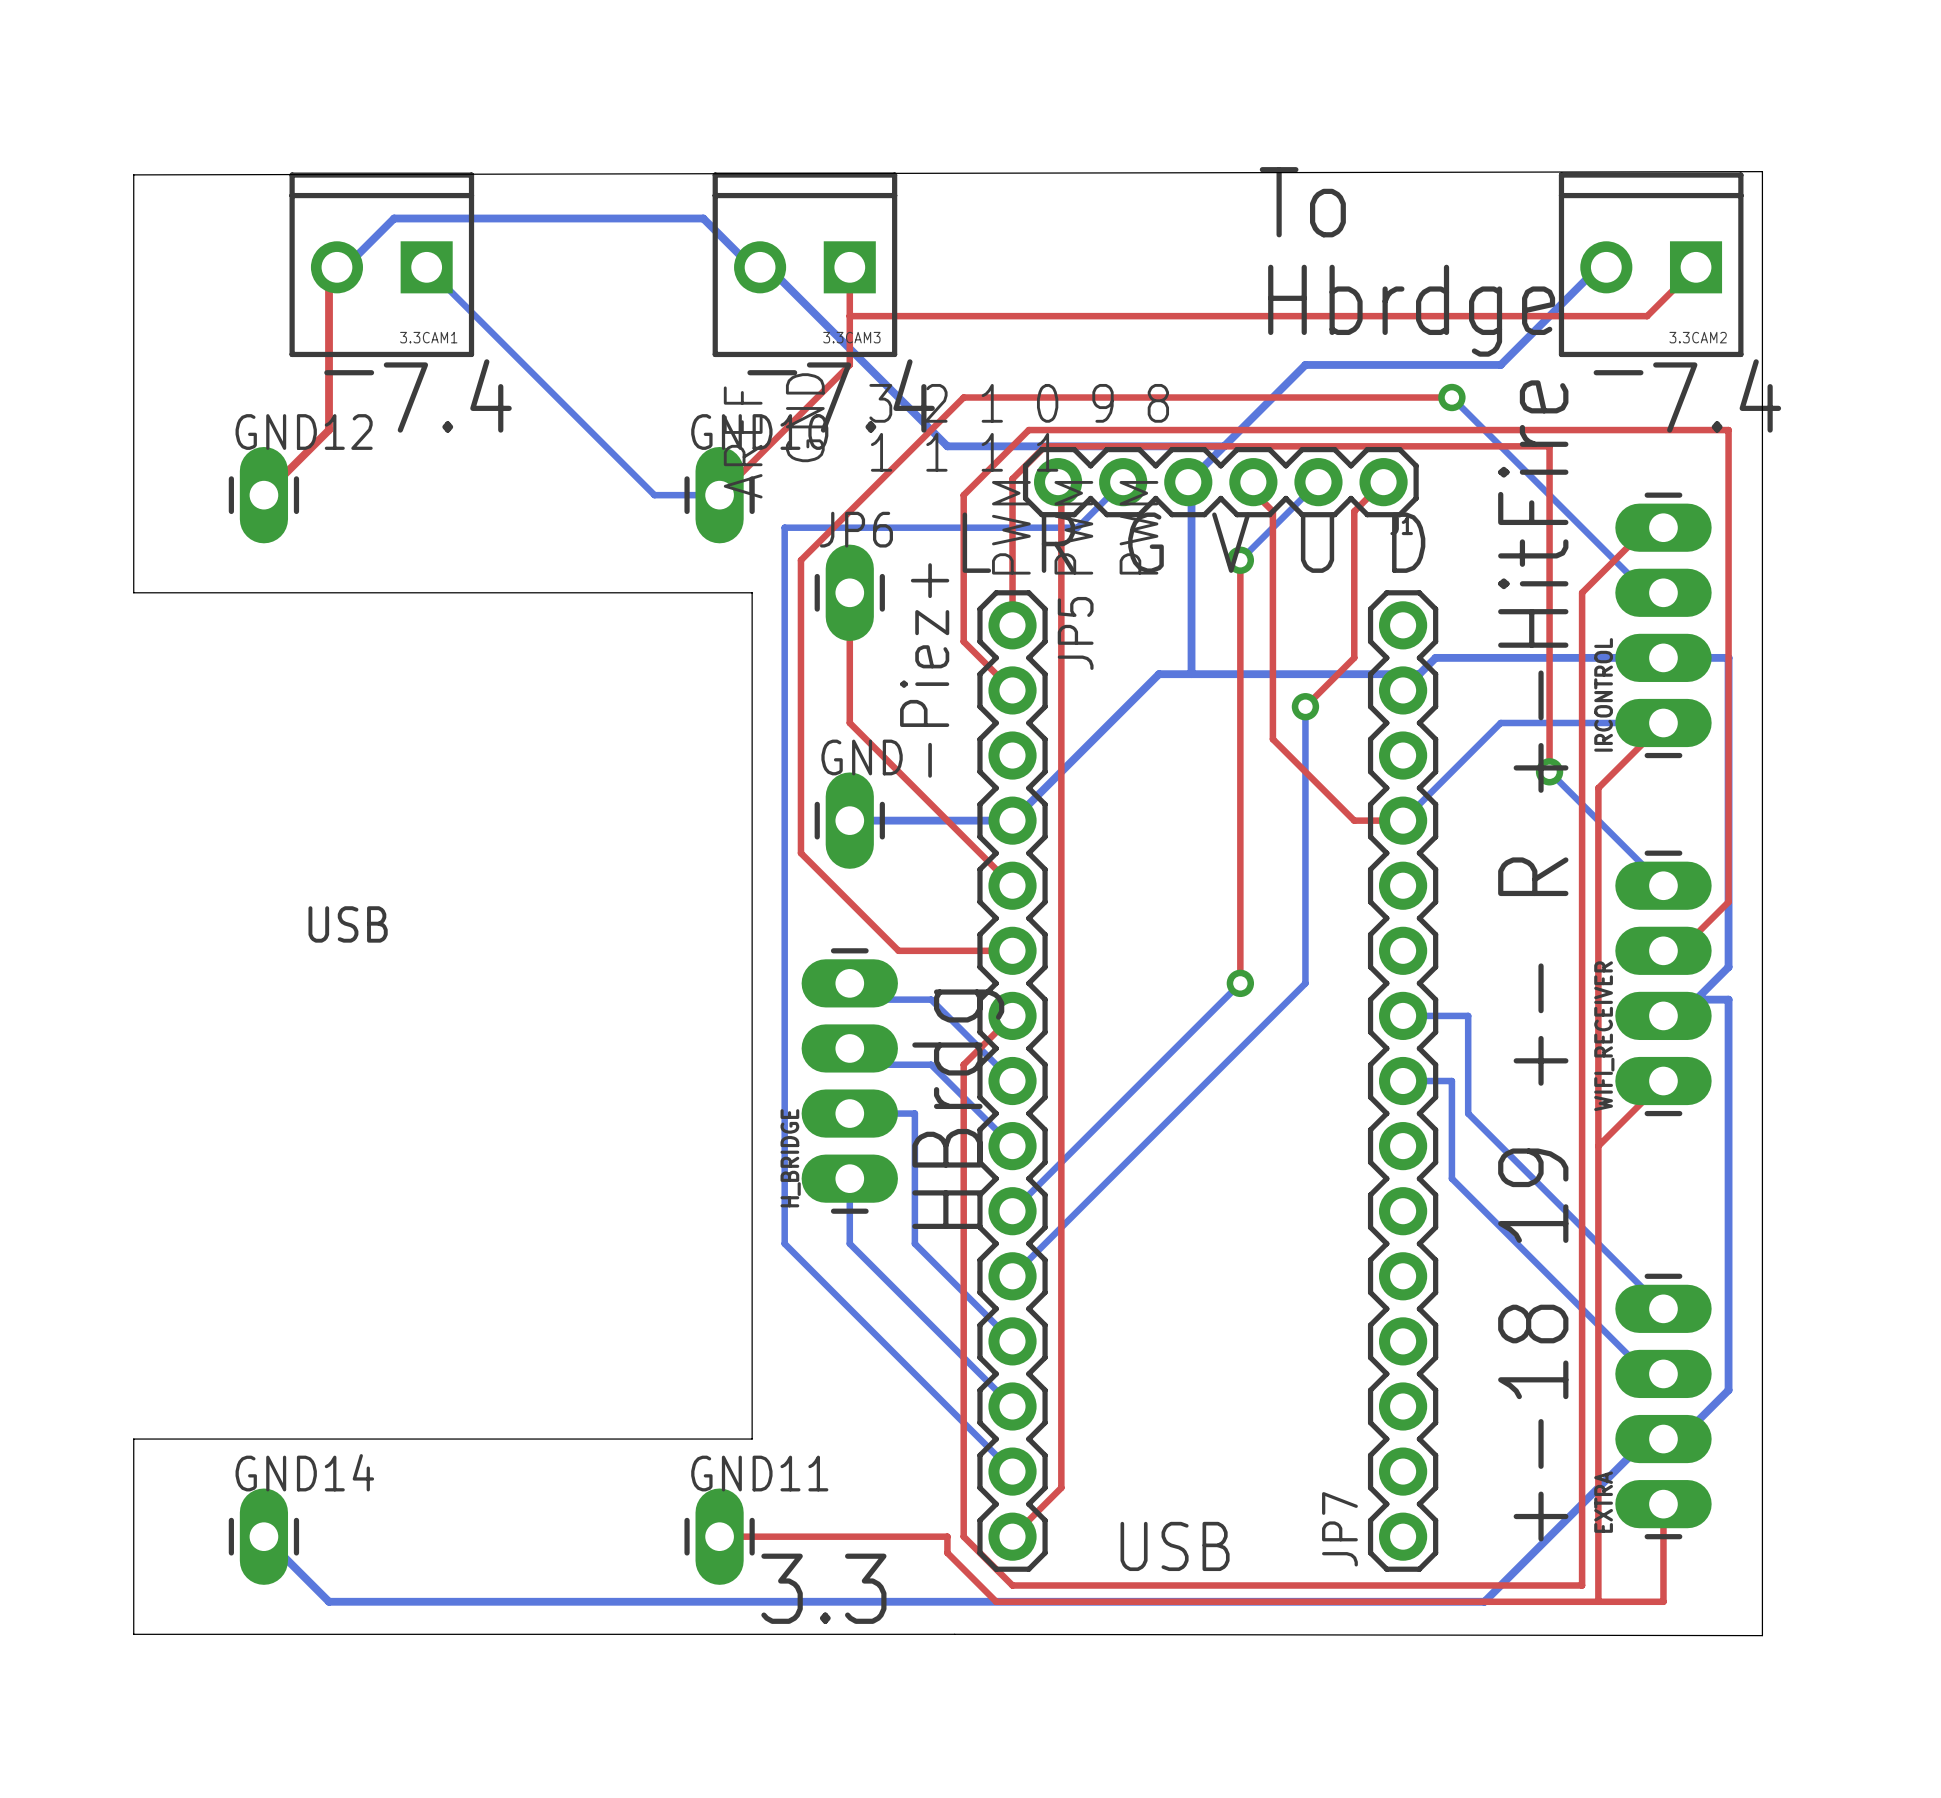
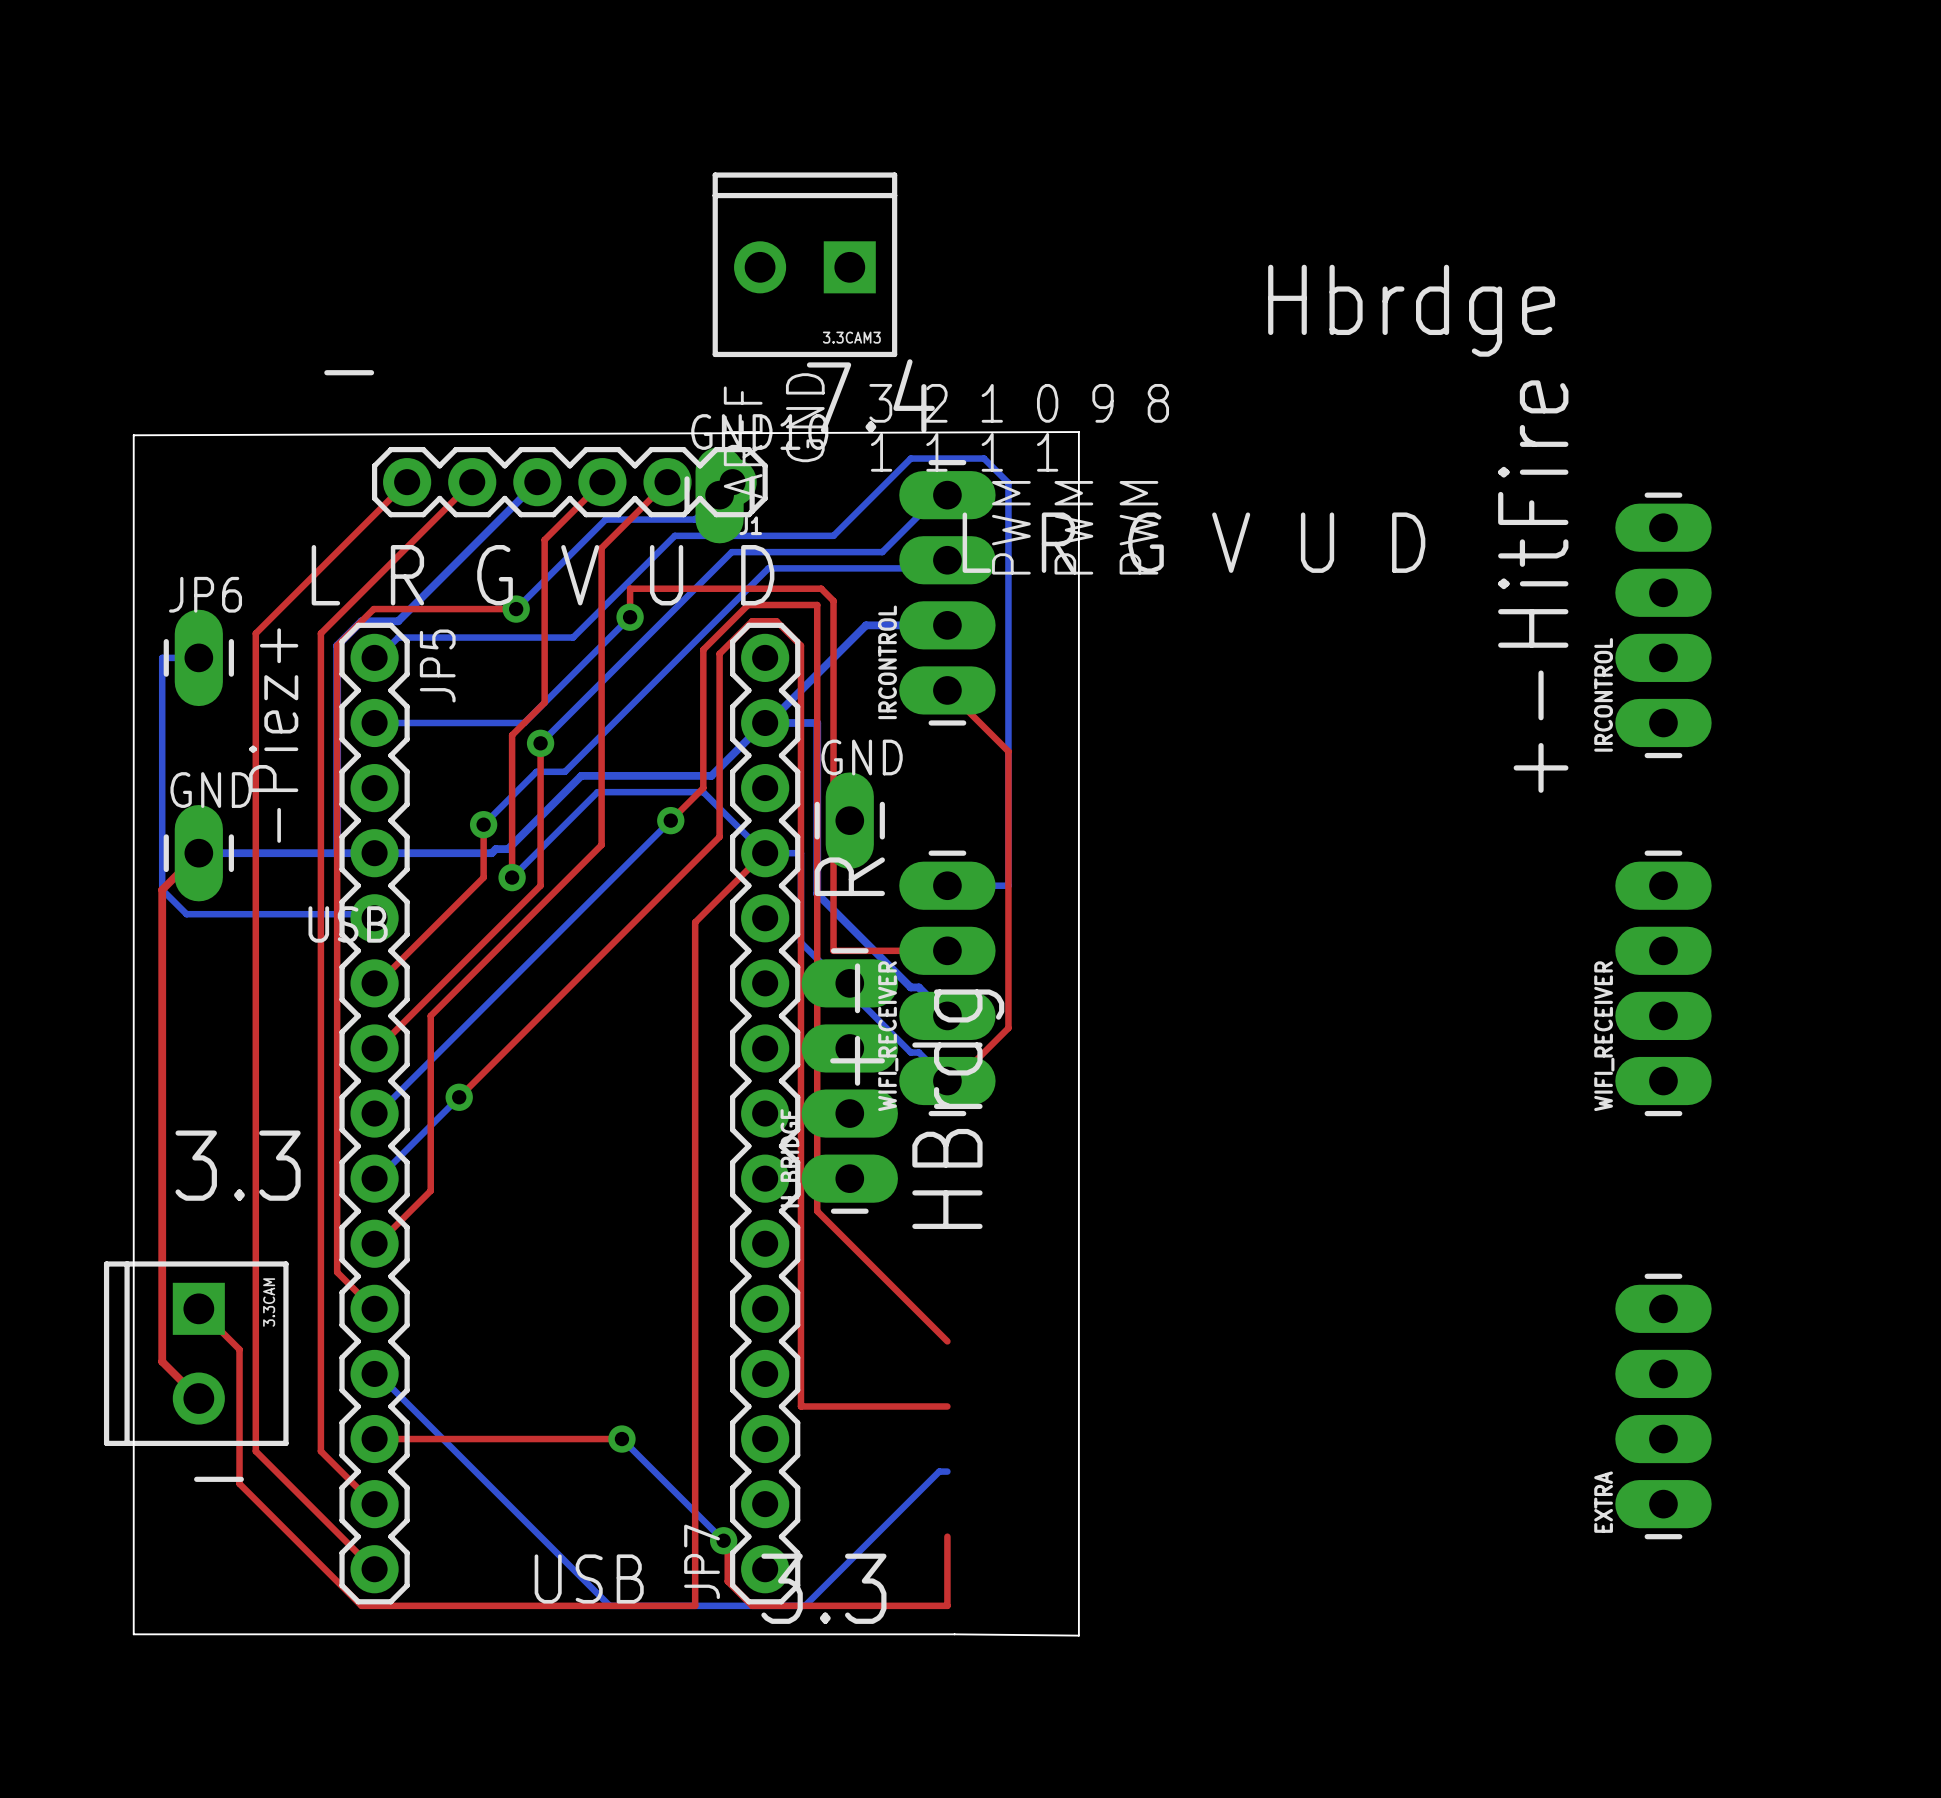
text: To (1302, 202) -> none
3.3CAM1: (381, 264) -> none
3.3CAM2: (1651, 264) -> none
bottom track: (336, 267) (345, 267) (394, 218) (703, 218) (752, 267) (768, 267) (947, 446) (1224, 446) -> none
top track: (336, 267) (329, 267) (329, 430) (263, 495) -> none
bottom track: (426, 267) (654, 495) (719, 495) -> none
top track: (849, 267) (849, 364) (719, 495) -> none
bottom track: (1606, 267) (1598, 267) (1500, 364) (1305, 364) (1188, 482) (1191, 495) (1191, 674) -> none
top track: (1696, 267) (1647, 316) (849, 316) -> none
text: - (772, 372) -> none
text: - (1618, 372) -> none
text: 7.4 (447, 395) -> none
text: 7.4 (1717, 395) -> none
bottom track: (1451, 397) (1647, 592) (1663, 592) -> none
top track: (1451, 397) (963, 397) (800, 560) (800, 645) -> (459, 1097) (719, 836) (719, 653) (752, 621) (776, 621) (800, 645)
via: (1451, 397) -> none
board edge: (133, 435) (133, 174) (1762, 171) (1762, 1635) (954, 1634) -> (133, 435) (1078, 432) (1078, 1635) (954, 1634)
top track: none -> (407, 482) (255, 633) (255, 1451) (374, 1569)
top track: none -> (472, 482) (320, 633) (320, 1451) (374, 1504)
bottom track: none -> (537, 482) (398, 621) (361, 621) (337, 645) (337, 853)
top track: none -> (602, 482) (544, 539) (544, 702) (512, 735) (512, 877)
top track: none -> (667, 482) (601, 548) (601, 845) (430, 1015) (430, 1190) (377, 1243) (374, 1243)
bottom track: none -> (732, 482) (695, 519) (605, 519) (516, 609)
top track: (1058, 482) (1061, 495) (1061, 1487) (1012, 1536) -> none
bottom track: (1123, 482) (1077, 527) (784, 527) (784, 1243) (1012, 1471) -> none
J1 position: (1220, 482) -> (569, 482)
top track: (1253, 482) (1256, 495) (1272, 511) (1272, 739) (1354, 820) (1403, 820) -> none
bottom track: (1318, 482) (1240, 560) -> none
top track: (1383, 482) (1354, 511) (1354, 657) (1305, 706) -> none
GND12: (263, 495) -> none
bottom track: none -> (947, 495) (939, 495) (882, 552) (731, 552) (540, 743)
top track: (1663, 527) (1647, 527) (1582, 592) (1582, 1585) (1012, 1585) (963, 1536) (963, 1064) (1012, 1015) -> none
bottom track: none -> (947, 560) (939, 568) (768, 568) (564, 771) (536, 771) (483, 824)
top track: (1240, 560) (1240, 983) -> none
via: (1240, 560) -> none
text: none -> L R G V U D (543, 575)
board edge: (133, 592) (752, 592) (752, 1439) (133, 1439) -> (133, 592) (133, 1439)
top track: (849, 592) (849, 722) (1012, 885) -> none
JP6 position: (849, 592) -> (198, 657)
IRCONTROL: none -> (947, 592)
top track: none -> (516, 609) (373, 609) (337, 645) (337, 1272) (374, 1308)
via: none -> (516, 609)
bottom track: none -> (630, 617) (524, 722) (374, 722)
via: none -> (630, 617)
bottom track: none -> (947, 625) (866, 625) (768, 722)
top track: (1012, 625) (1012, 478) (1045, 446) (1549, 446) (1549, 771) -> none
bottom track: none -> (198, 657) (162, 657) (162, 889) (186, 914) (369, 914) (374, 918)
bottom track: none -> (374, 657) (377, 657) (398, 637) (573, 637) (674, 535) (833, 535) (910, 458) (984, 458) (1008, 482) (1008, 885) (947, 885)
text: -Piez+ (924, 670) -> none
bottom track: (1419, 674) (1158, 674) (1012, 820) (849, 820) -> none
top track: none -> (947, 690) (1008, 751) (1008, 1028) (955, 1081) (947, 1081)
top track: (1012, 690) (963, 641) (963, 495) (1028, 430) (1728, 430) (1728, 902) (1679, 950) (1663, 950) -> none
bottom track: (1403, 690) (1435, 657) (1728, 657) (1728, 967) (1696, 999) (1663, 1015) (1679, 999) (1728, 999) (1728, 1390) (1696, 1422) (1679, 1422) (1663, 1439) (1647, 1439) (1484, 1601) (329, 1601) (263, 1536) -> none
bottom track: (1305, 706) (1305, 983) (1012, 1276) -> none
via: (1305, 706) -> none
bottom track: (1663, 722) (1500, 722) (1403, 820) -> none
top track: (1663, 722) (1598, 788) (1598, 1601) -> none
text: none -> -Piez+ (273, 735)
top track: none -> (540, 743) (540, 885) (377, 1048) (374, 1048)
via: none -> (540, 743)
bottom track: (1549, 771) (1663, 885) -> none
via: (1549, 771) -> none
bottom track: none -> (670, 820) (377, 1113) (374, 1113)
top track: none -> (670, 820) (703, 788) (703, 649) (748, 605) (817, 605) (817, 1211) (947, 1341)
via: none -> (670, 820)
top track: none -> (483, 824) (483, 877) (377, 983) (374, 983)
via: none -> (483, 824)
top track: none -> (198, 853) (162, 889) (162, 1361) (198, 1398)
GND: none -> (198, 853)
top track: none -> (765, 853) (695, 922) (695, 1605) (361, 1605) (239, 1483) (239, 1349) (198, 1308)
top track: (800, 853) (898, 950) -> (630, 617) (630, 588) (821, 588) (833, 600) (833, 950) (898, 950)
top track: none -> (800, 853) (800, 1406) (947, 1406)
via: none -> (512, 877)
top track: (947, 950) (1012, 950) -> none
text: none -> +- R (849, 971)
text: +- R (1533, 971) -> none
bottom track: (849, 983) (866, 999) (931, 999) -> (198, 853) (491, 853) (495, 849) (508, 849) (581, 775) (711, 775) (764, 722) (817, 722) (817, 893) (910, 987) (918, 987) (931, 999)
WIFI_RECEIVER: none -> (947, 983)
bottom track: (1240, 983) (1012, 1211) -> none
via: (1240, 983) -> none
bottom track: (947, 1015) (1012, 1081) -> none
bottom track: (1403, 1015) (1468, 1015) (1468, 1113) (1663, 1308) -> none
bottom track: (849, 1048) (866, 1064) (931, 1064) -> (512, 877) (597, 792) (703, 792) (764, 853) (800, 853) (800, 942) (910, 1052) (918, 1052) (931, 1064)
bottom track: (947, 1081) (1012, 1146) -> none
JP5 position: (1012, 1081) -> (374, 1113)
bottom track: (1403, 1081) (1451, 1081) (1451, 1178) (1630, 1357) (1647, 1357) (1663, 1373) -> none
JP7 position: (1403, 1081) -> (765, 1113)
top track: (1663, 1081) (1598, 1146) -> none
bottom track: none -> (459, 1097) (377, 1178) (374, 1178)
via: none -> (459, 1097)
bottom track: (849, 1113) (914, 1113) (914, 1243) (1012, 1341) -> none
text: none -> 3.3 (238, 1165)
bottom track: (849, 1178) (849, 1243) (1012, 1406) -> none
text: +-18 19 (1533, 1344) -> none
3.3CAM: none -> (196, 1353)
bottom track: none -> (374, 1373) (377, 1373) (609, 1605) (805, 1605) (939, 1471) (947, 1471)
top track: none -> (374, 1439) (621, 1439)
bottom track: none -> (621, 1439) (723, 1540)
via: none -> (621, 1439)
text: none -> - (218, 1479)
top track: (1663, 1504) (1663, 1601) (996, 1601) (947, 1552) -> (723, 1540) (727, 1544) (727, 1581) (752, 1605) (947, 1605) (947, 1552)
GND14: (263, 1536) -> none
top track: (719, 1536) (947, 1536) -> none
GND11: (719, 1536) -> none
via: none -> (723, 1540)
text position: USB (1175, 1546) -> USB (589, 1578)

